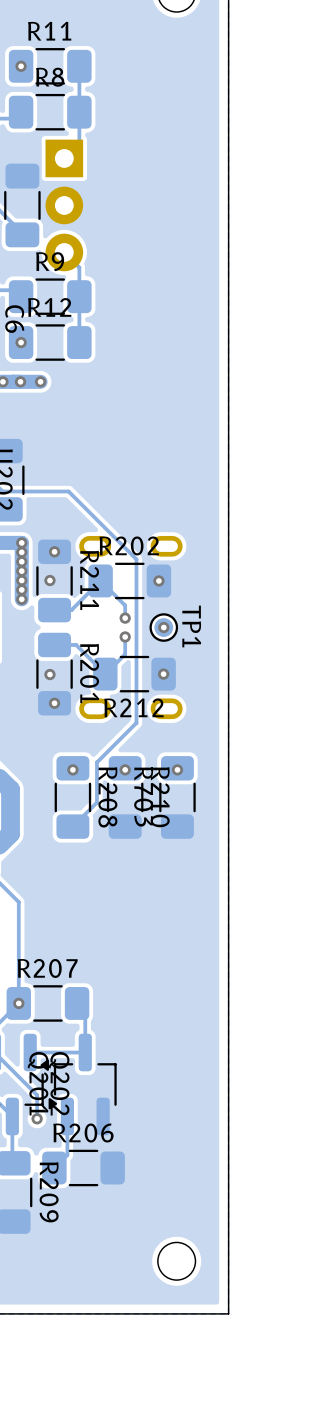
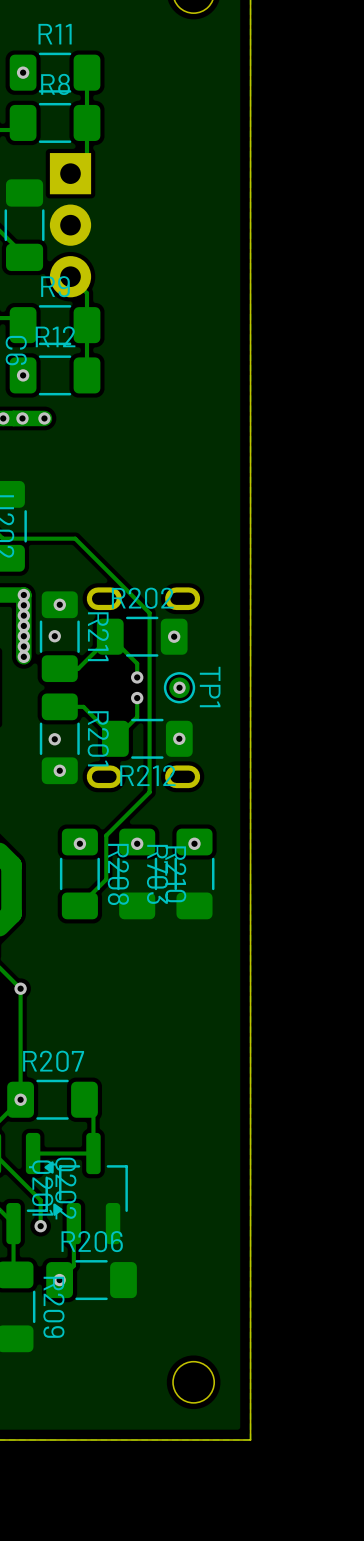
via: none -> (20, 988)
via: none -> (59, 1280)

